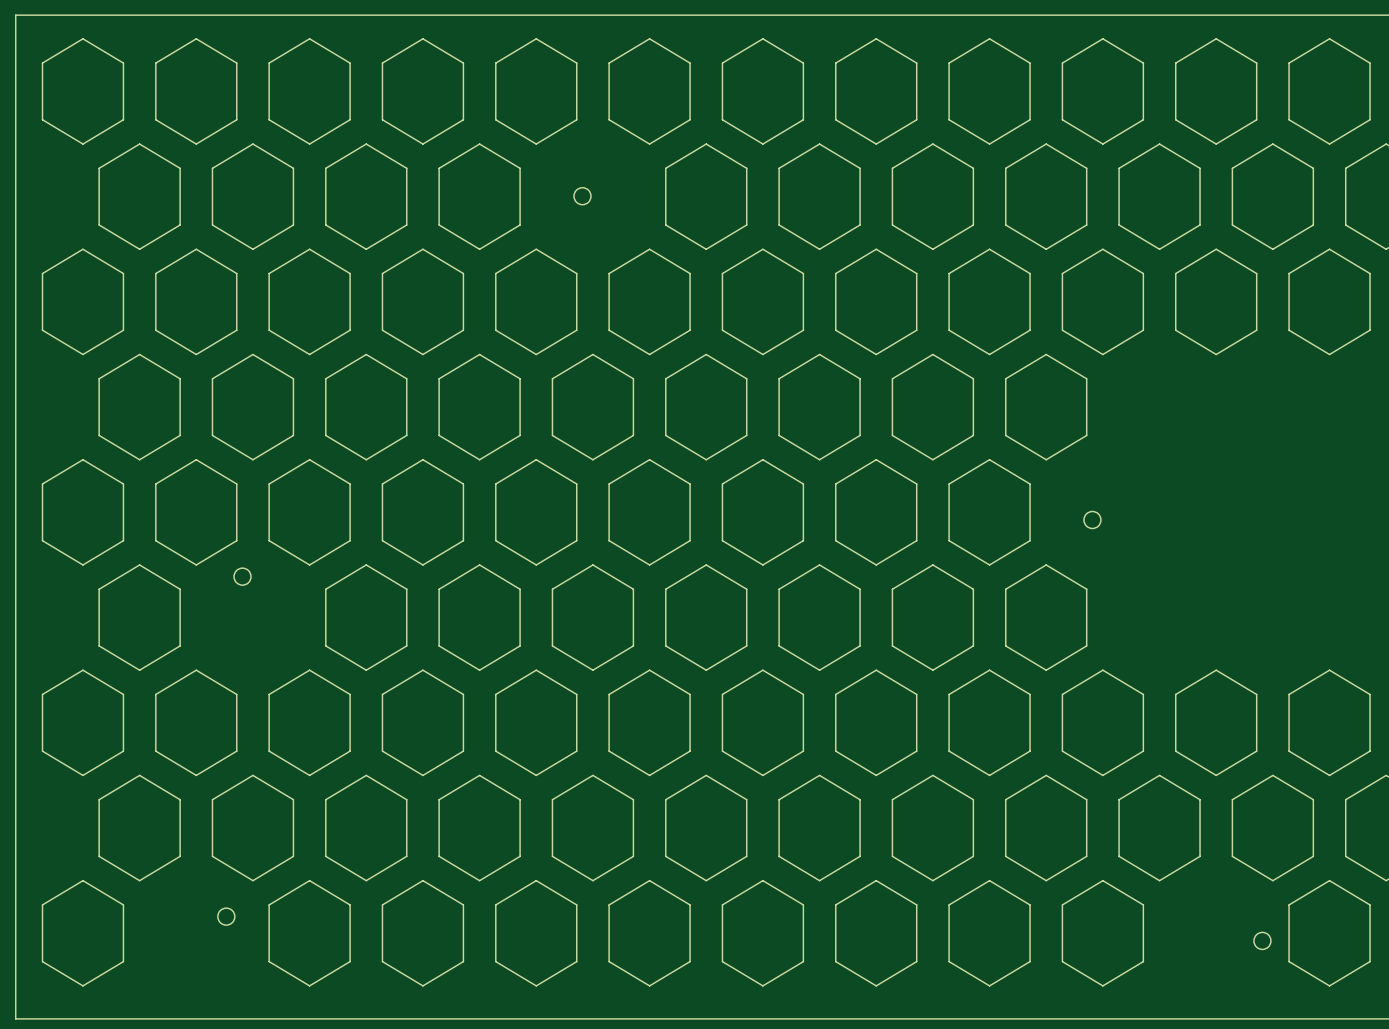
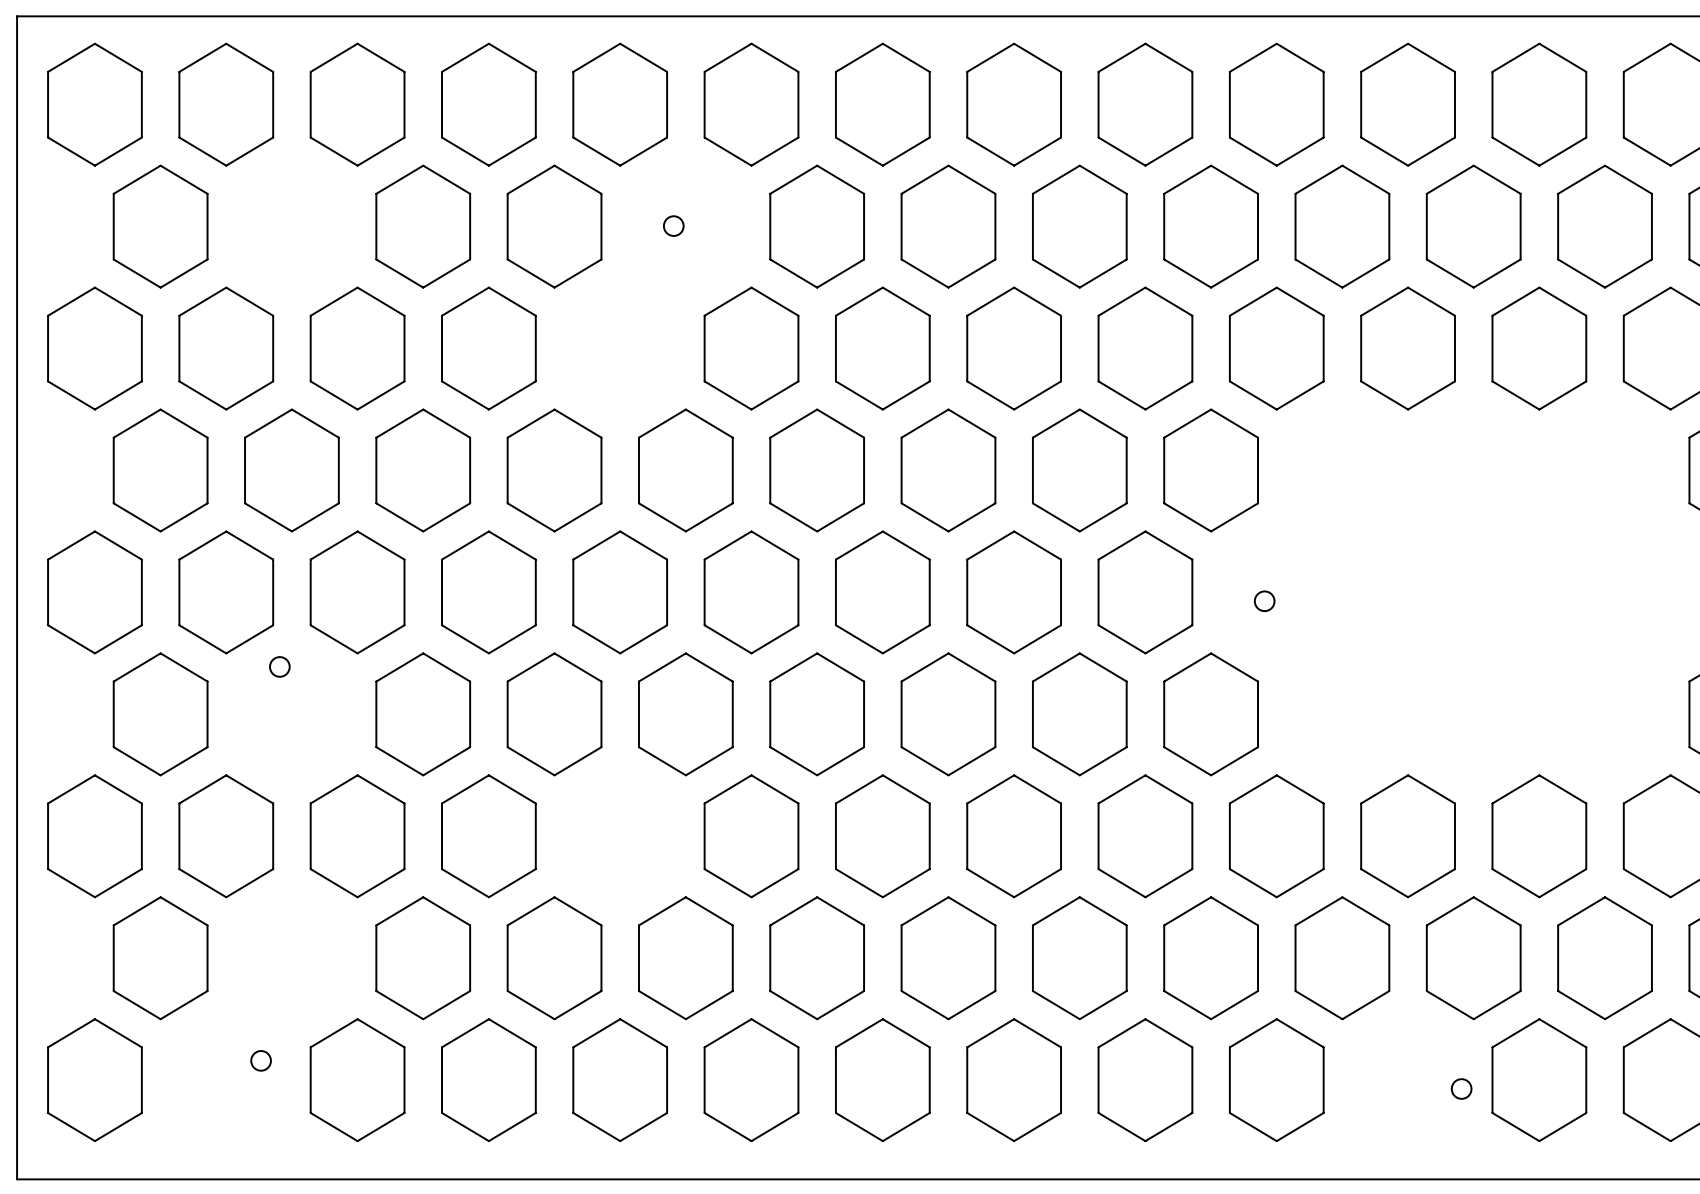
board edge: (252, 144) (293, 168) (293, 225) (252, 249) (212, 225) (212, 168) (252, 144) -> none
board edge: (536, 249) (576, 273) (576, 330) (536, 354) (495, 330) (495, 273) (536, 249) -> none
board edge: (536, 670) (495, 694) (495, 751) (536, 775) (576, 751) (576, 694) (536, 670) -> none
board edge: (252, 775) (212, 799) (212, 856) (252, 880) (293, 856) (293, 799) (252, 775) -> none

